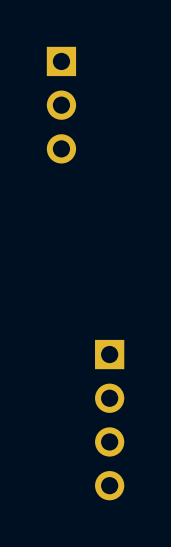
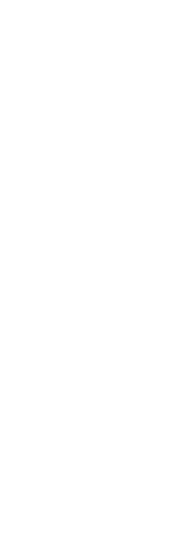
part: (61, 105) -> none
part: (109, 420) -> none

